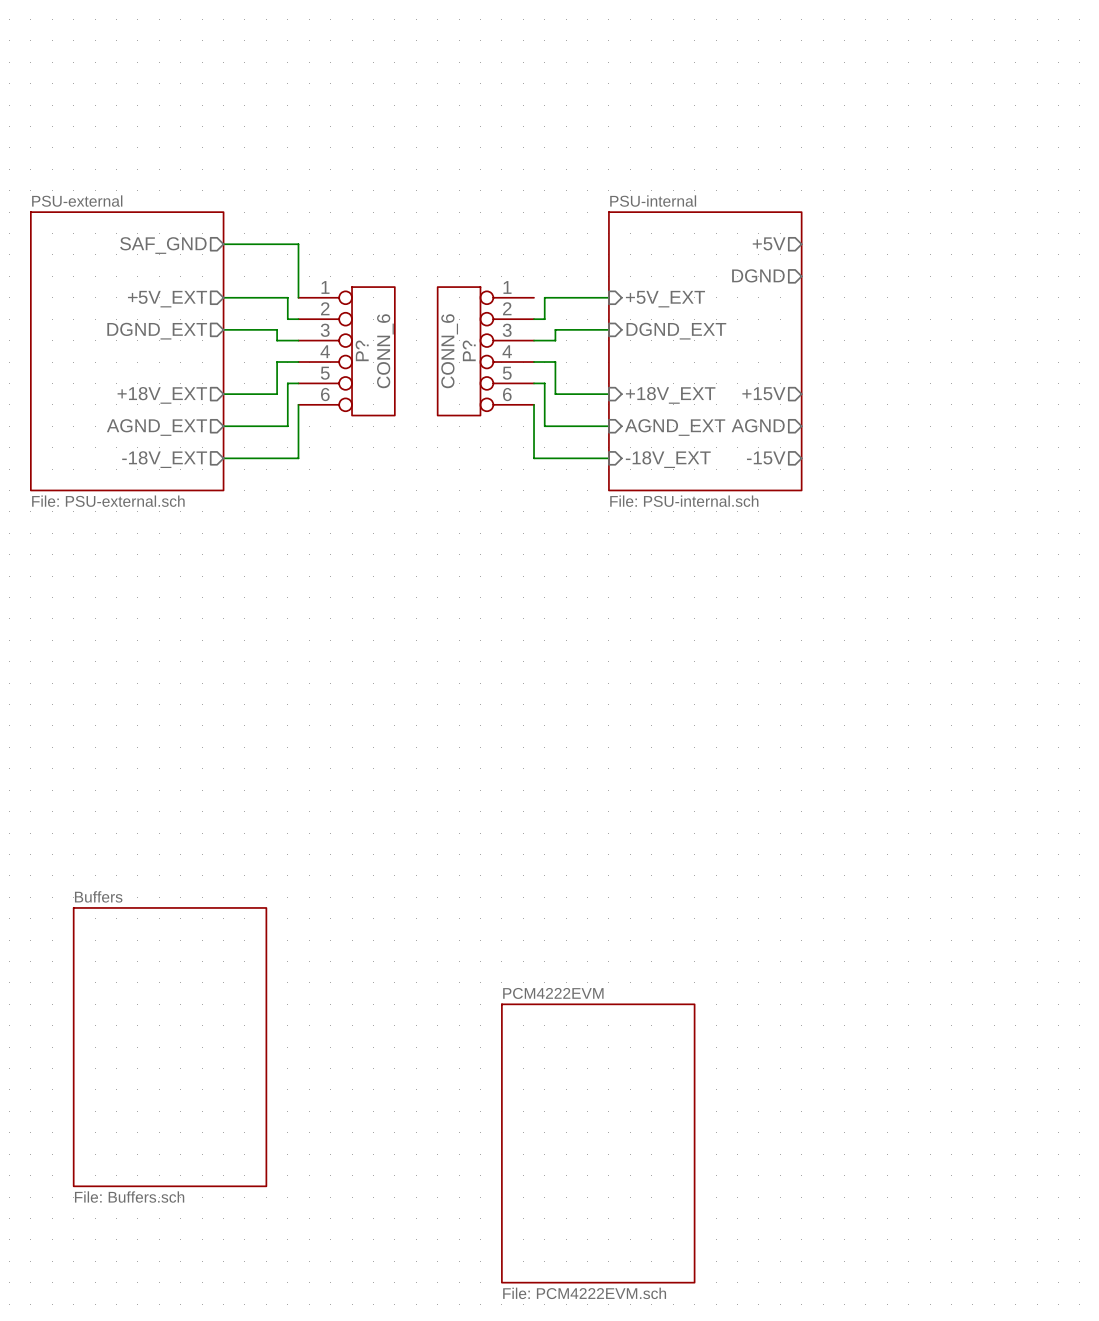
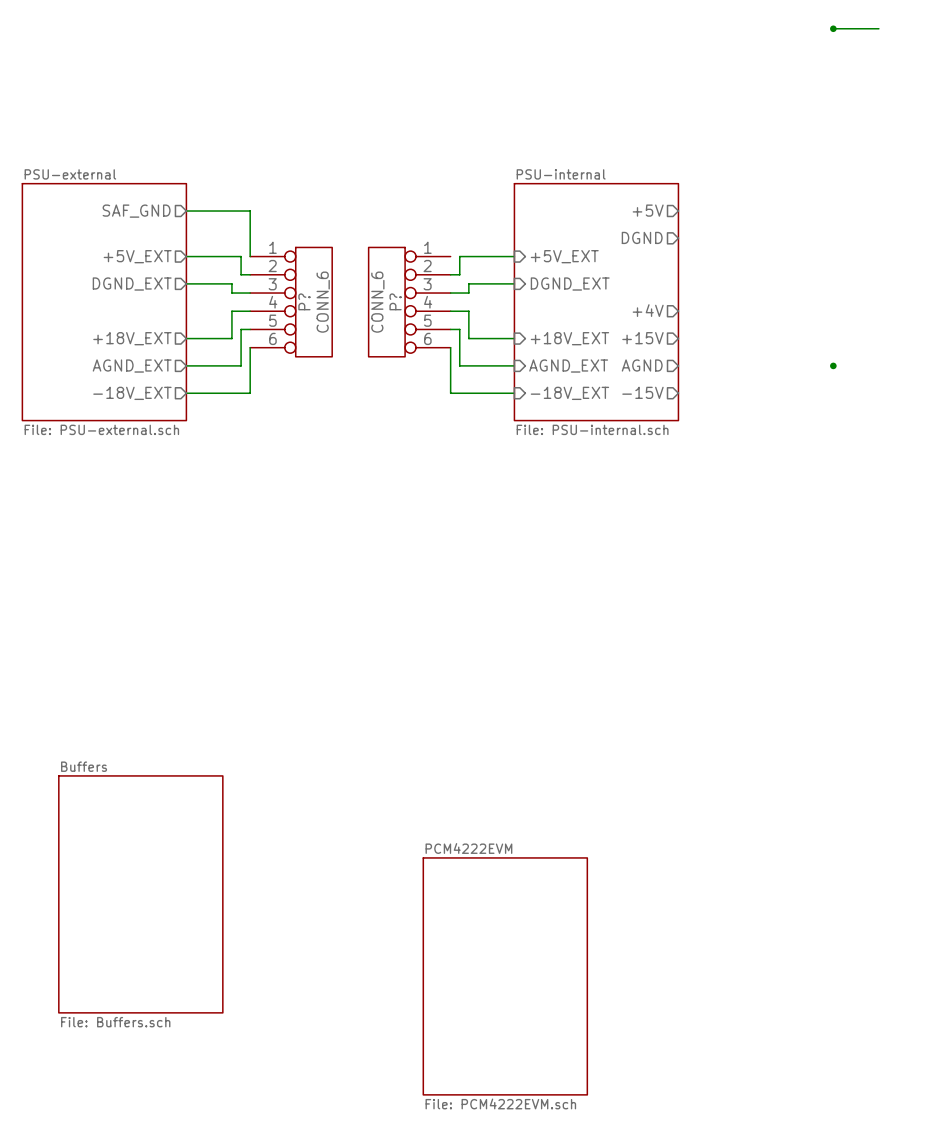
wire: none -> (833, 28) (878, 28)
junction: none -> (833, 28)
sheet pin: none -> +4V (648, 310)
junction: none -> (833, 365)

